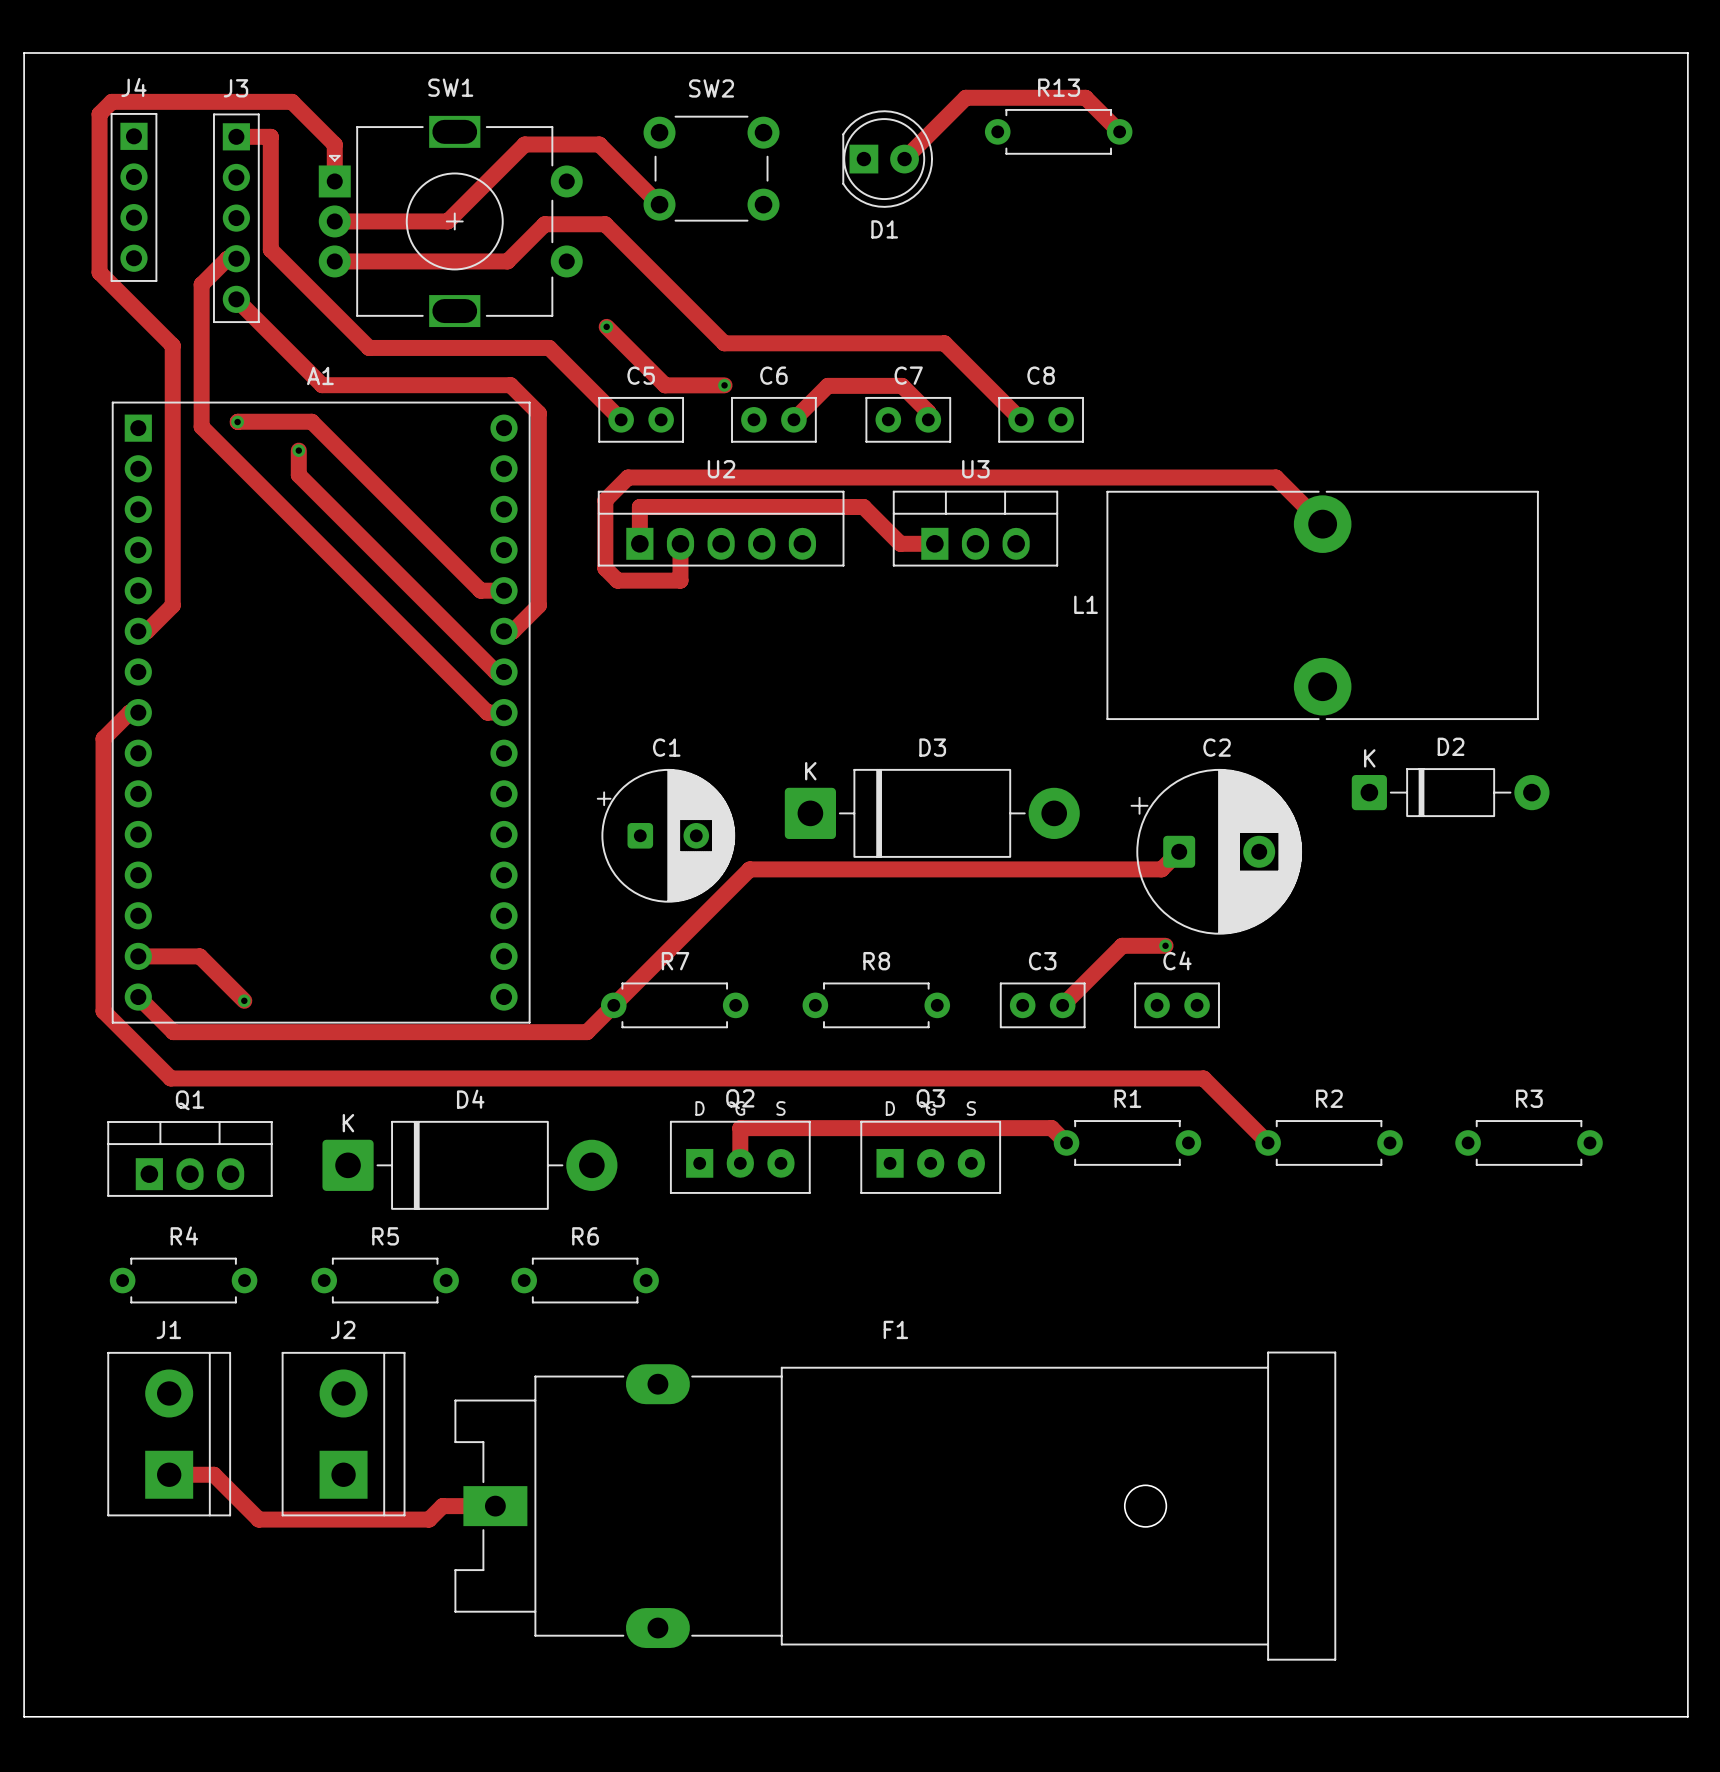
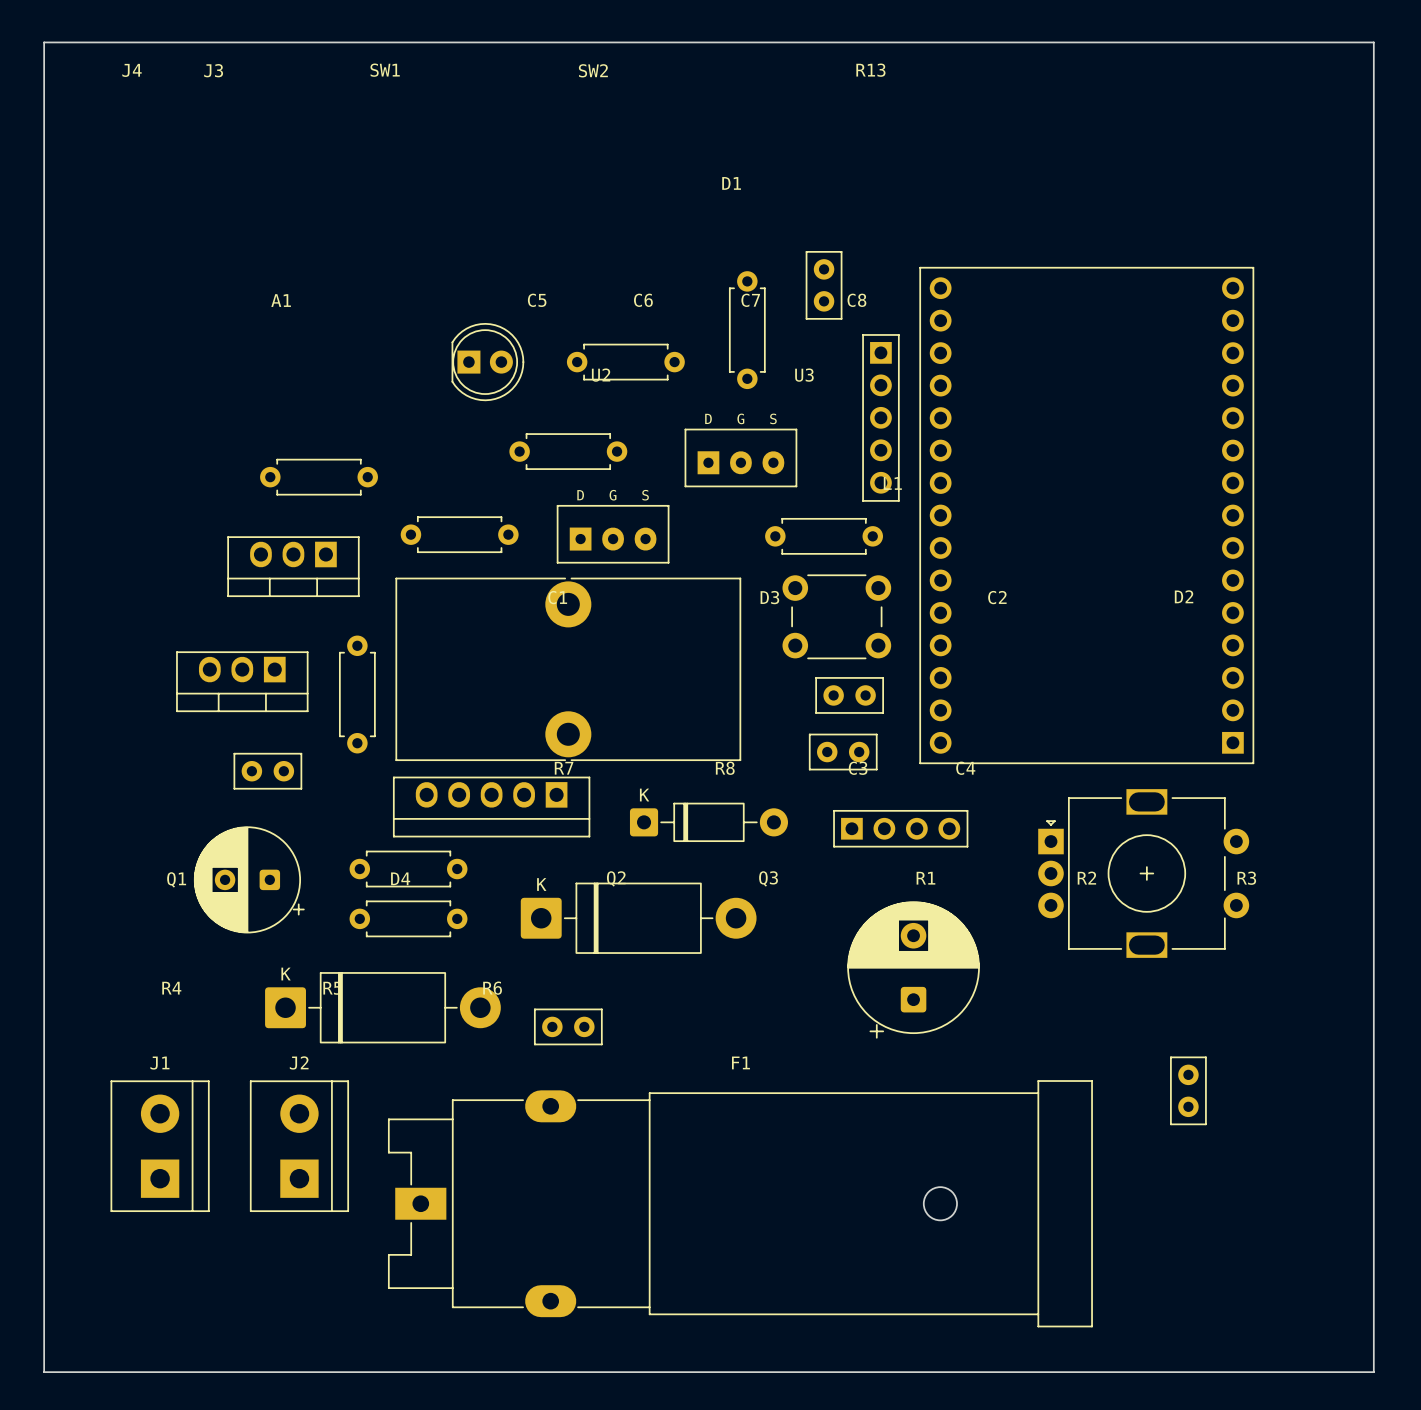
part: (1058, 131) -> none
track: (1119, 131) (1085, 97) (965, 97) (904, 159) -> none
track: (236, 136) (270, 136) (270, 249) (369, 347) (549, 347) (621, 419) -> none
part: (887, 159) -> none
part: (711, 168) -> none
track: (334, 181) (334, 144) (291, 101) (111, 101) (99, 114) (99, 272) (172, 345) (172, 605) (146, 631) (138, 631) -> none
part: (133, 197) -> none
track: (659, 204) (599, 144) (524, 144) (447, 221) (334, 221) -> none
part: (236, 218) -> none
part: (450, 221) -> none
track: (236, 258) (227, 258) (201, 284) (201, 426) (487, 712) (504, 712) -> none
track: (334, 261) (507, 261) (544, 224) (605, 224) (724, 343) (944, 343) (1021, 419) -> none
track: (236, 299) (322, 385) (510, 385) (538, 413) (538, 605) (513, 631) (504, 631) -> none
track: (606, 326) (665, 385) (724, 385) -> none
via: (606, 326) -> none
via: (724, 385) -> none
part footprint: [865, 396, 952, 443] -> [729, 271, 766, 390]
part footprint: [111, 401, 531, 1024] -> [227, 536, 360, 597]
part: (641, 419) -> none
part: (773, 419) -> none
track: (793, 419) (827, 385) (902, 385) (928, 412) (928, 419) -> none
part rotation: 0° (1041, 419) -> 90° clockwise (824, 285)
part position: (1041, 419) -> (824, 285)
track: (237, 422) (311, 421) (480, 590) (504, 590) -> none
via: (237, 422) -> none
track: (298, 450) (298, 475) (495, 671) (504, 671) -> none
via: (298, 450) -> none
part: none -> (487, 362)
part: none -> (625, 362)
part: none -> (880, 417)
track: (1322, 524) (1276, 477) (628, 477) (605, 500) (605, 568) (617, 580) (680, 580) (680, 543) -> none
part: (721, 528) -> none
part: (975, 528) -> none
track: (639, 543) (639, 507) (863, 507) (900, 543) (934, 543) -> none
part: none -> (568, 451)
part: none -> (740, 457)
part: none -> (319, 477)
part: (1322, 605) -> none
part: none -> (1086, 515)
part: none -> (459, 534)
part: none -> (613, 534)
part: none -> (824, 536)
track: (138, 712) (129, 712) (103, 738) (103, 1011) (170, 1078) (1203, 1078) (1268, 1142) -> none
part footprint: [596, 768, 736, 903] -> [395, 577, 742, 761]
part: none -> (836, 616)
part: (1450, 792) -> none
part: (932, 813) -> none
track: (1179, 851) (1161, 869) (749, 869) (587, 1032) (173, 1032) (138, 997) -> none
part rotation: 0° (1216, 851) -> 90° counterclockwise (913, 969)
part position: (1216, 851) -> (913, 969)
part: none -> (357, 694)
part: none -> (849, 695)
track: (1165, 945) (1122, 945) (1062, 1005) -> none
via: (1165, 945) -> none
track: (138, 956) (199, 956) (244, 1000) -> none
part: none -> (267, 771)
via: (244, 1000) -> none
part: (674, 1005) -> none
part: (876, 1005) -> none
part position: (1042, 1005) -> (843, 752)
part: (1177, 1005) -> none
part: none -> (491, 807)
part: none -> (708, 822)
part: none -> (900, 828)
part: none -> (408, 869)
part: none -> (1143, 873)
part: none -> (249, 879)
track: (1066, 1142) (1051, 1128) (740, 1128) (740, 1163) -> none
part: (1127, 1142) -> none
part: (1329, 1142) -> none
part: (1529, 1142) -> none
part: none -> (638, 918)
part: none -> (408, 918)
part: (740, 1157) -> none
part: (930, 1157) -> none
part rotation: 0° (189, 1158) -> 180° (242, 681)
part position: (189, 1158) -> (242, 681)
part position: (469, 1165) -> (382, 1007)
part: (183, 1280) -> none
part: (385, 1280) -> none
part: (585, 1280) -> none
part: none -> (568, 1026)
part: none -> (1188, 1090)
track: (169, 1474) (214, 1474) (258, 1519) (429, 1519) (442, 1506) (495, 1506) -> none

